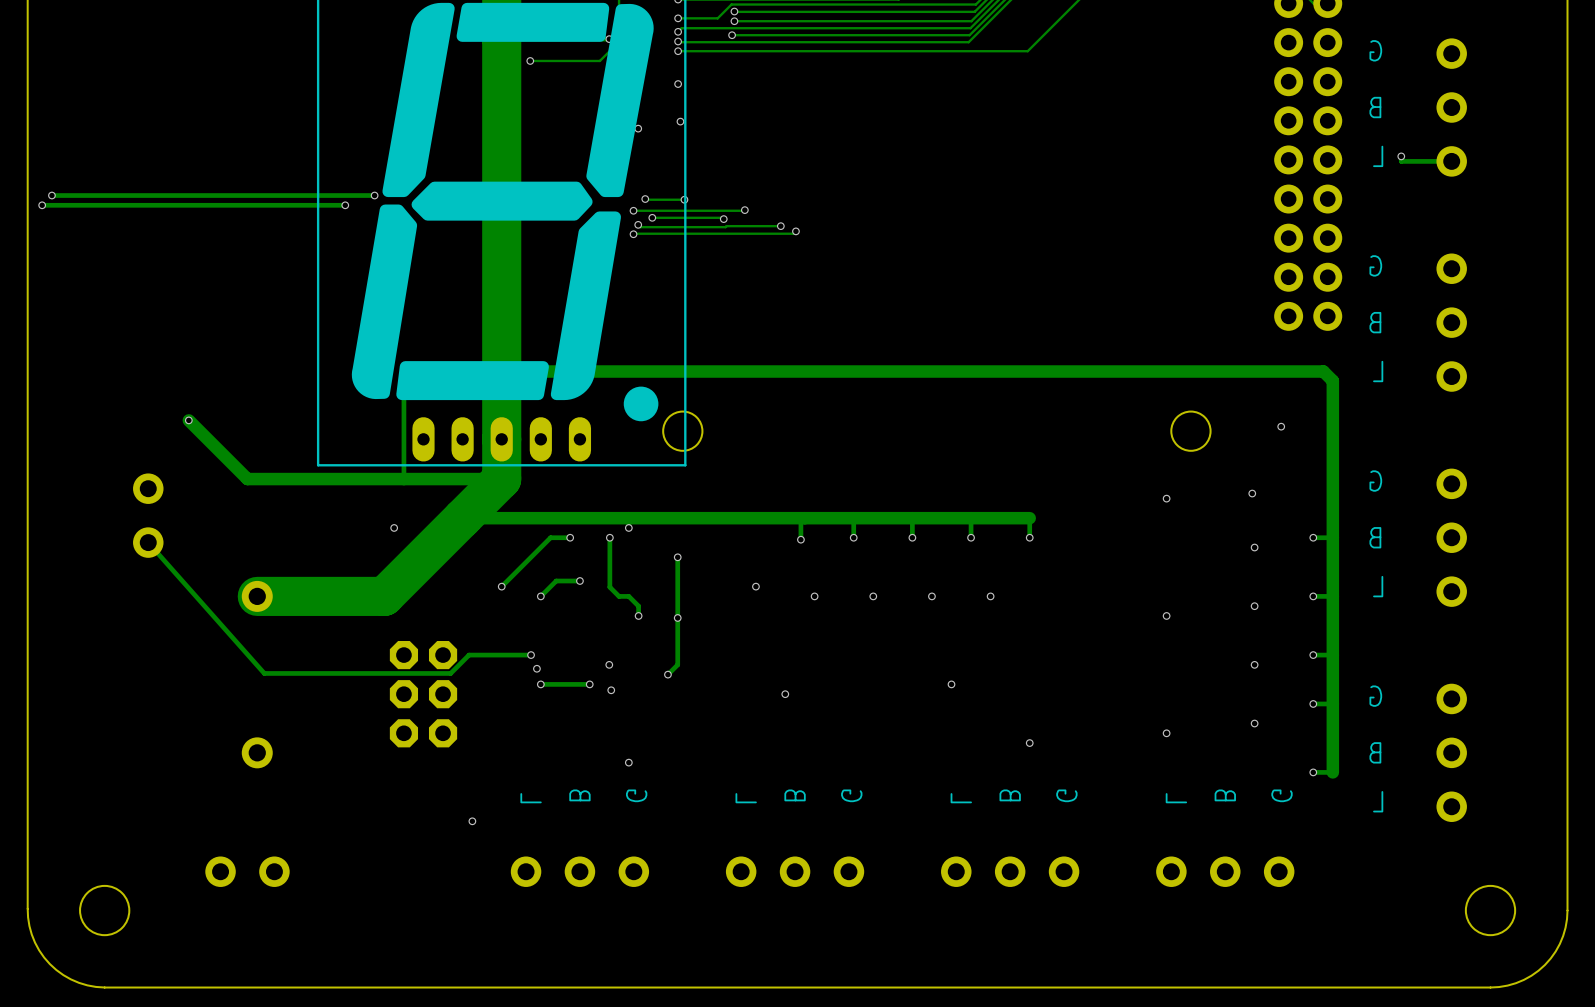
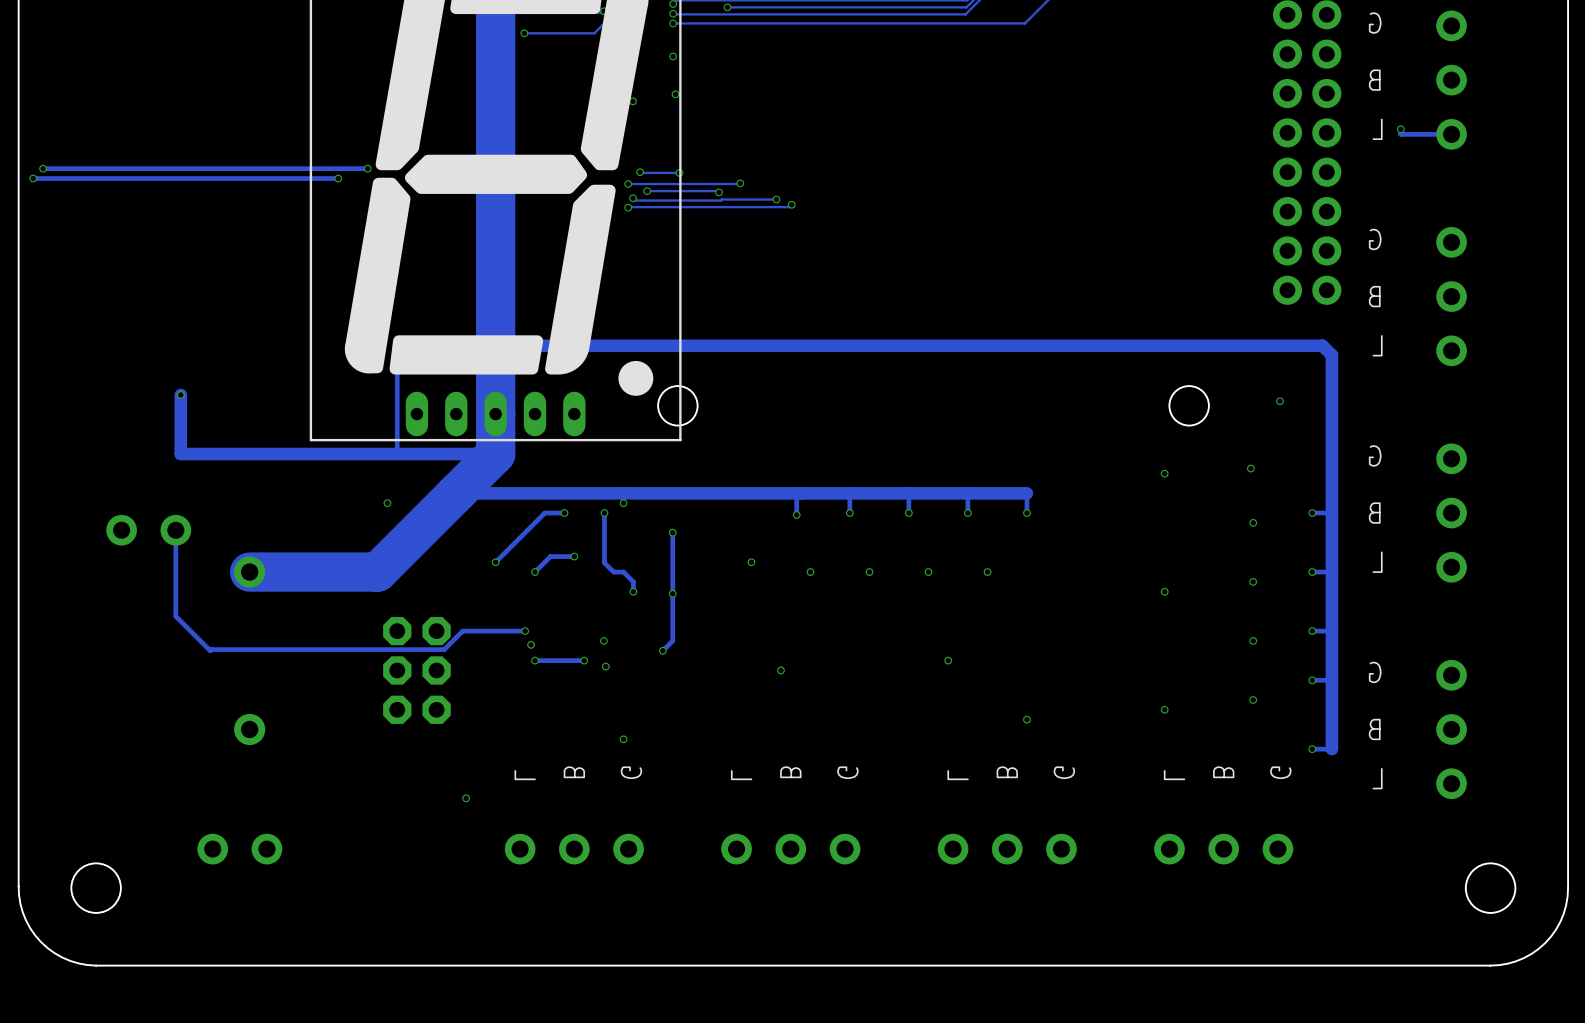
track: (188, 420) (247, 479) -> (180, 394) (180, 454) (239, 454)
part rotation: 0° (148, 515) -> 90° clockwise (148, 530)
track: (148, 542) (264, 673) -> (175, 530) (175, 616) (210, 650) (256, 649)

